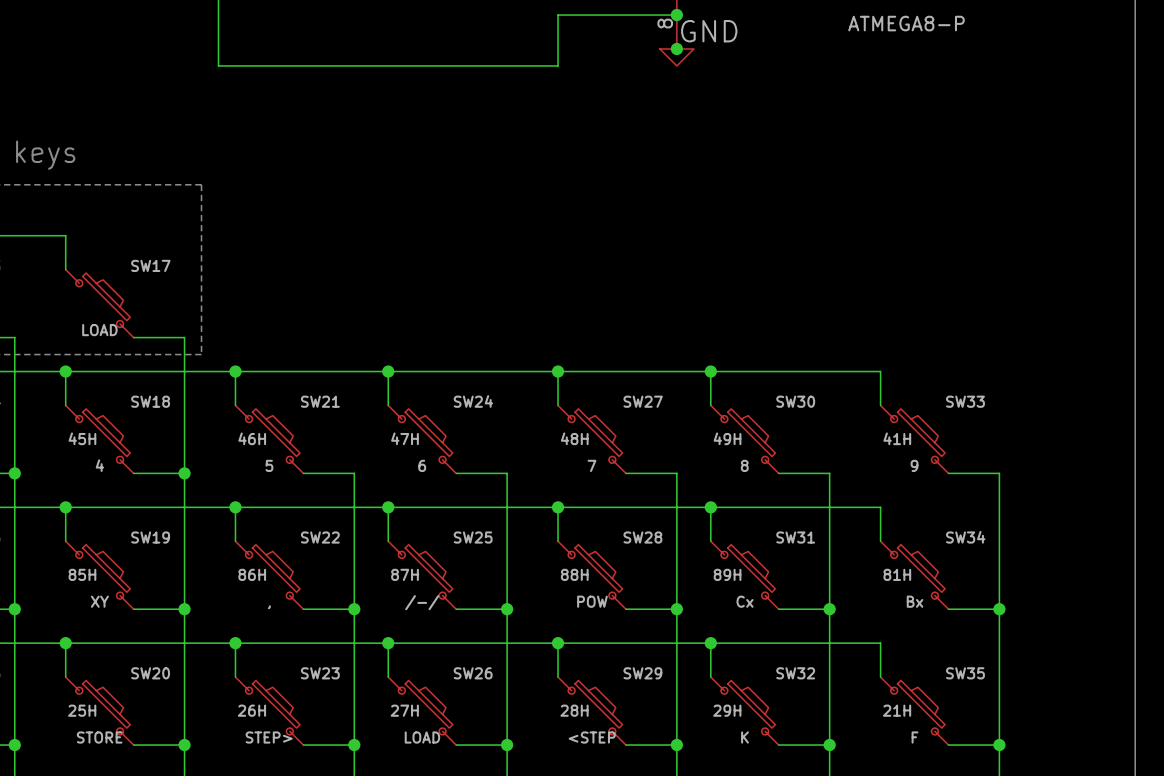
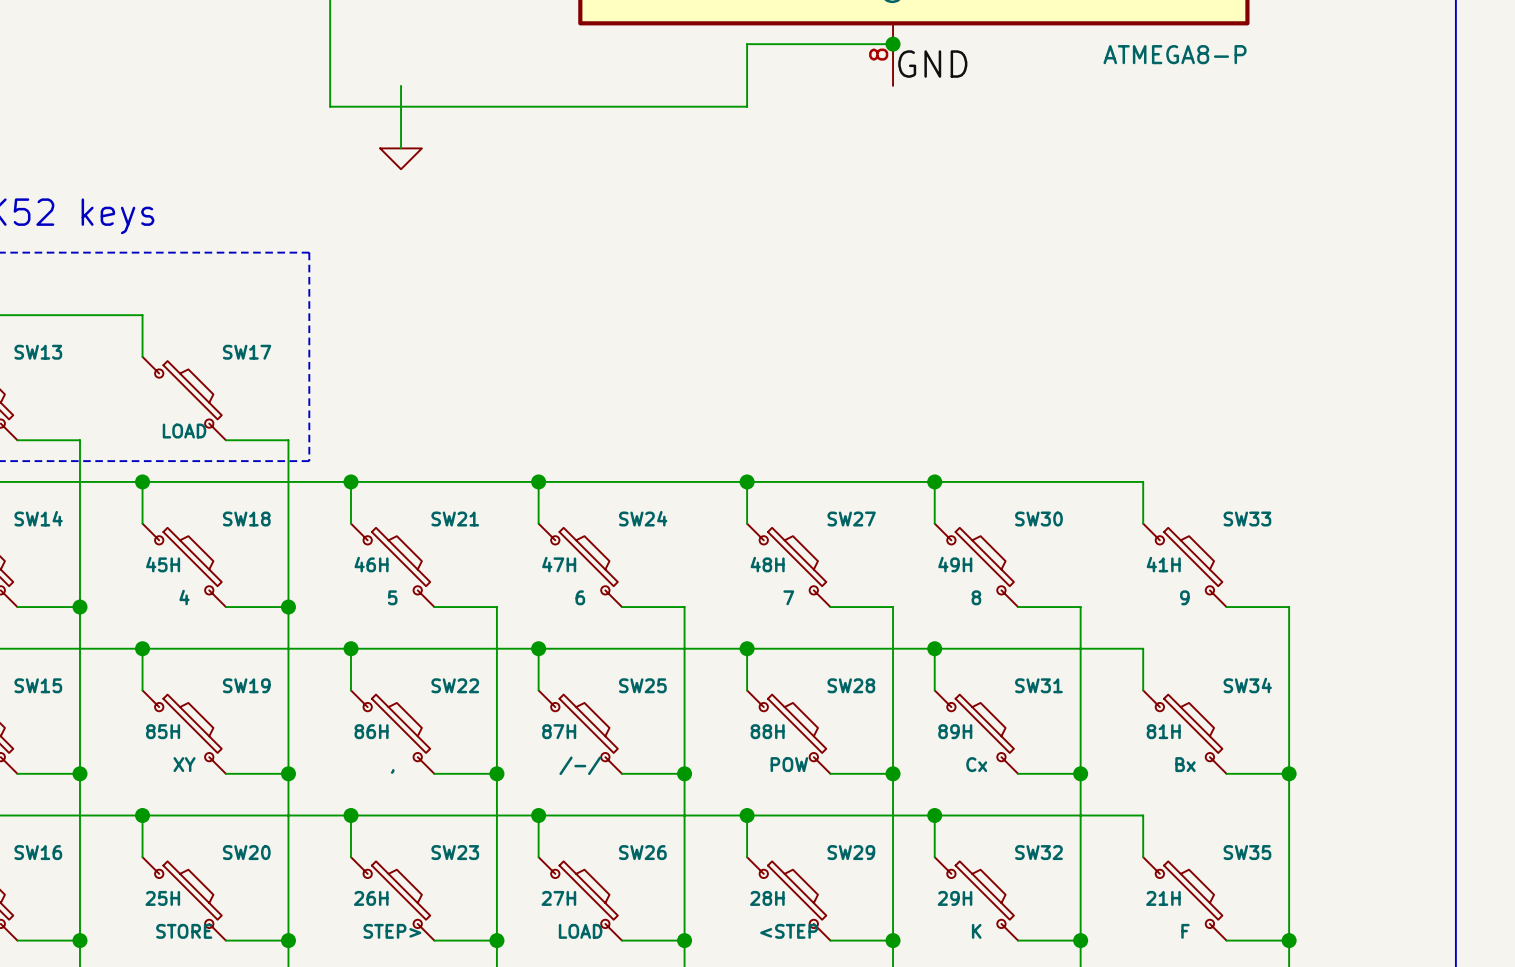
wire: none -> (401, 85) (401, 148)
junction: (676, 48) -> none
power symbol: (676, 57) -> none
power symbol: none -> (401, 158)

